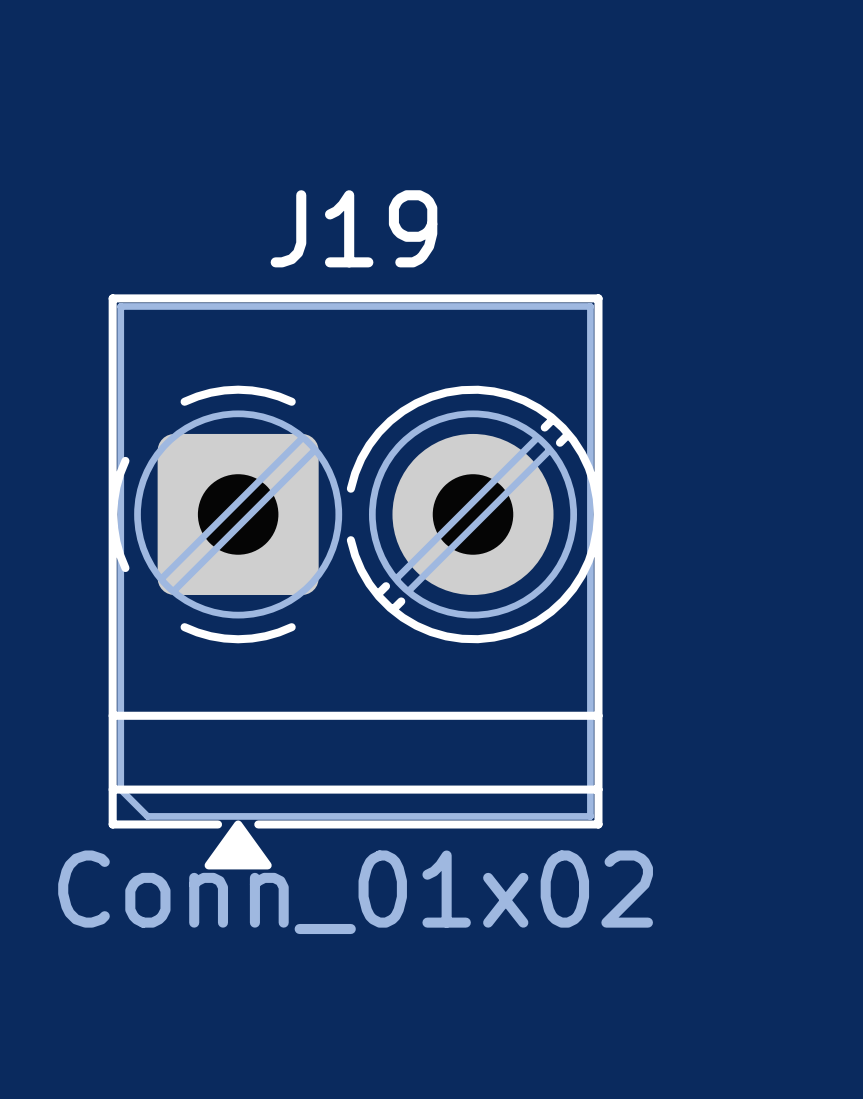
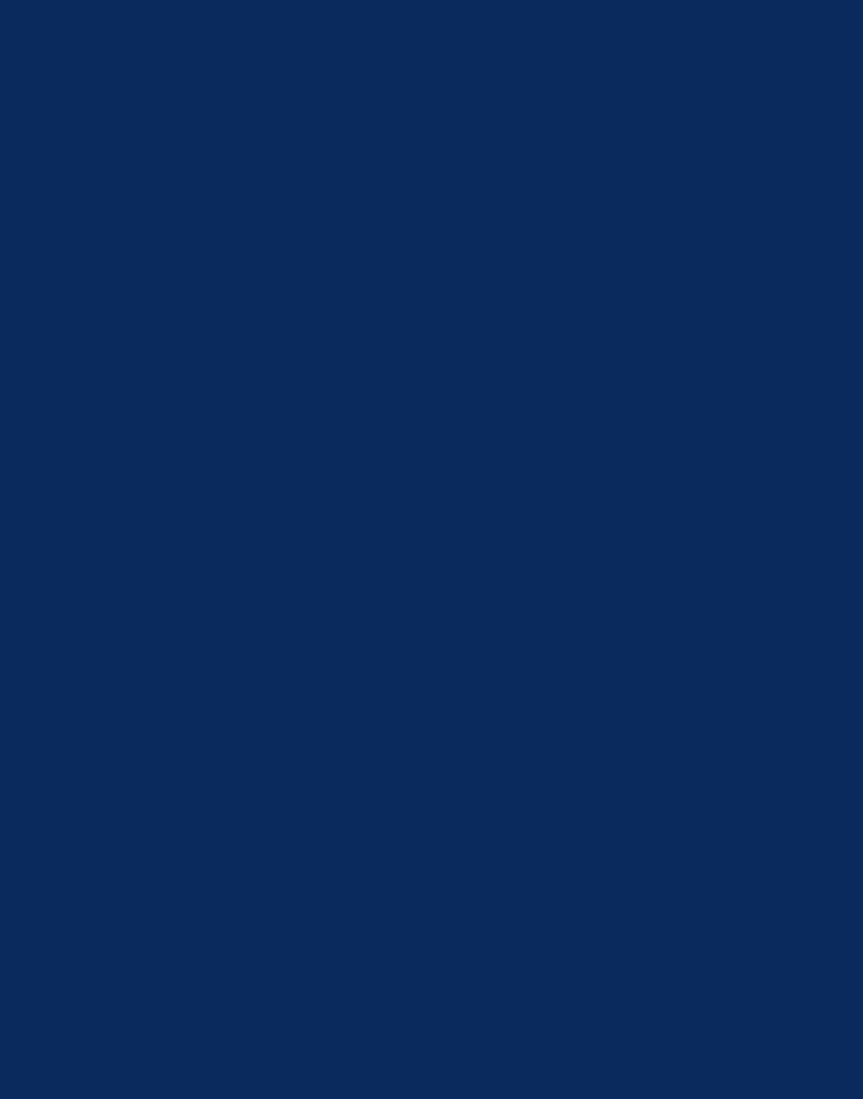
J19: Conn_01x02 (355, 581) -> none

